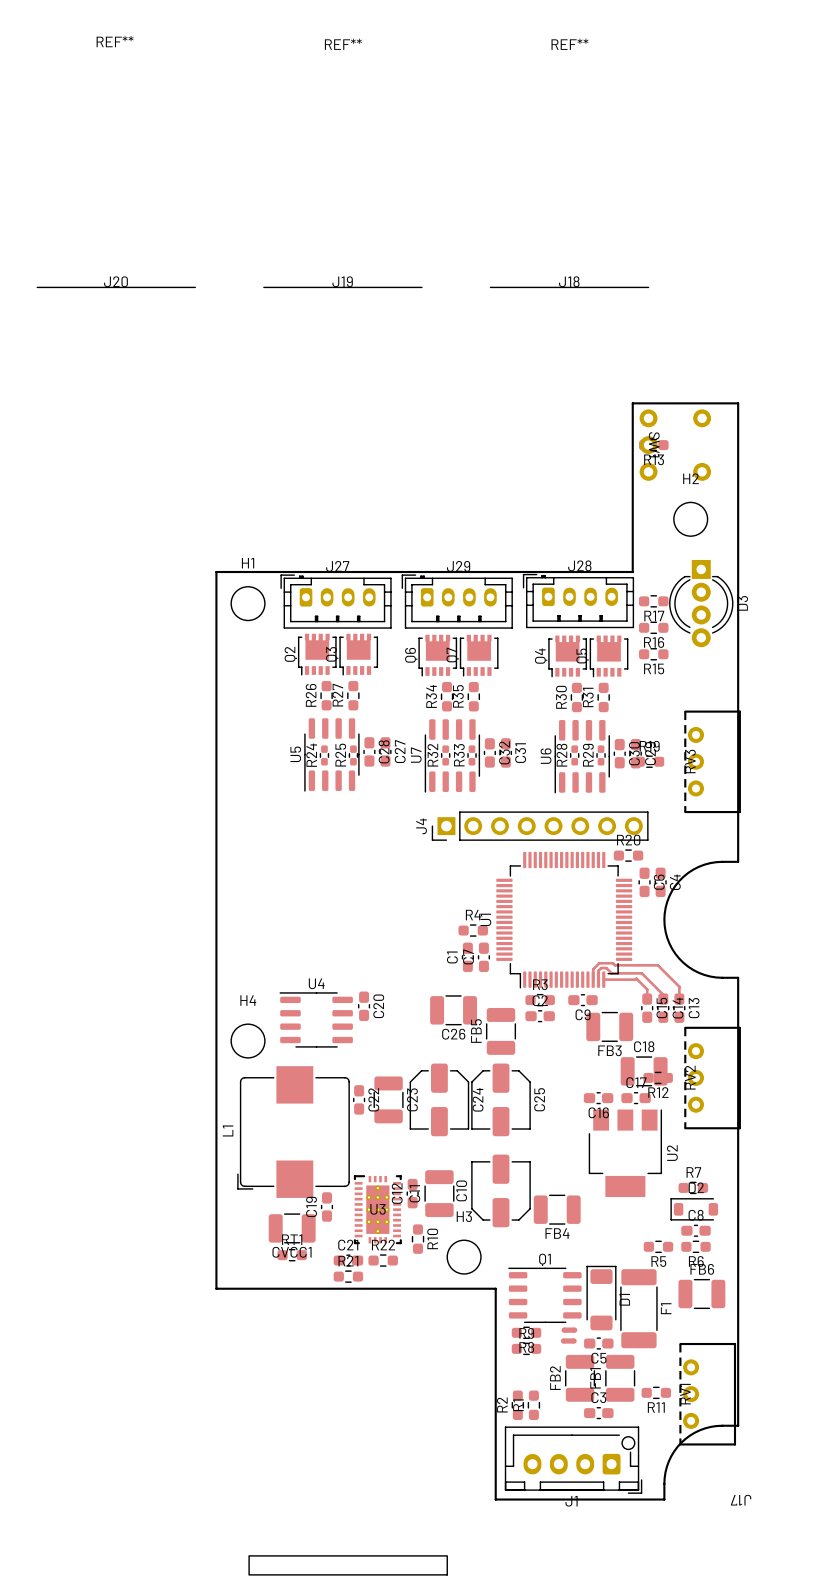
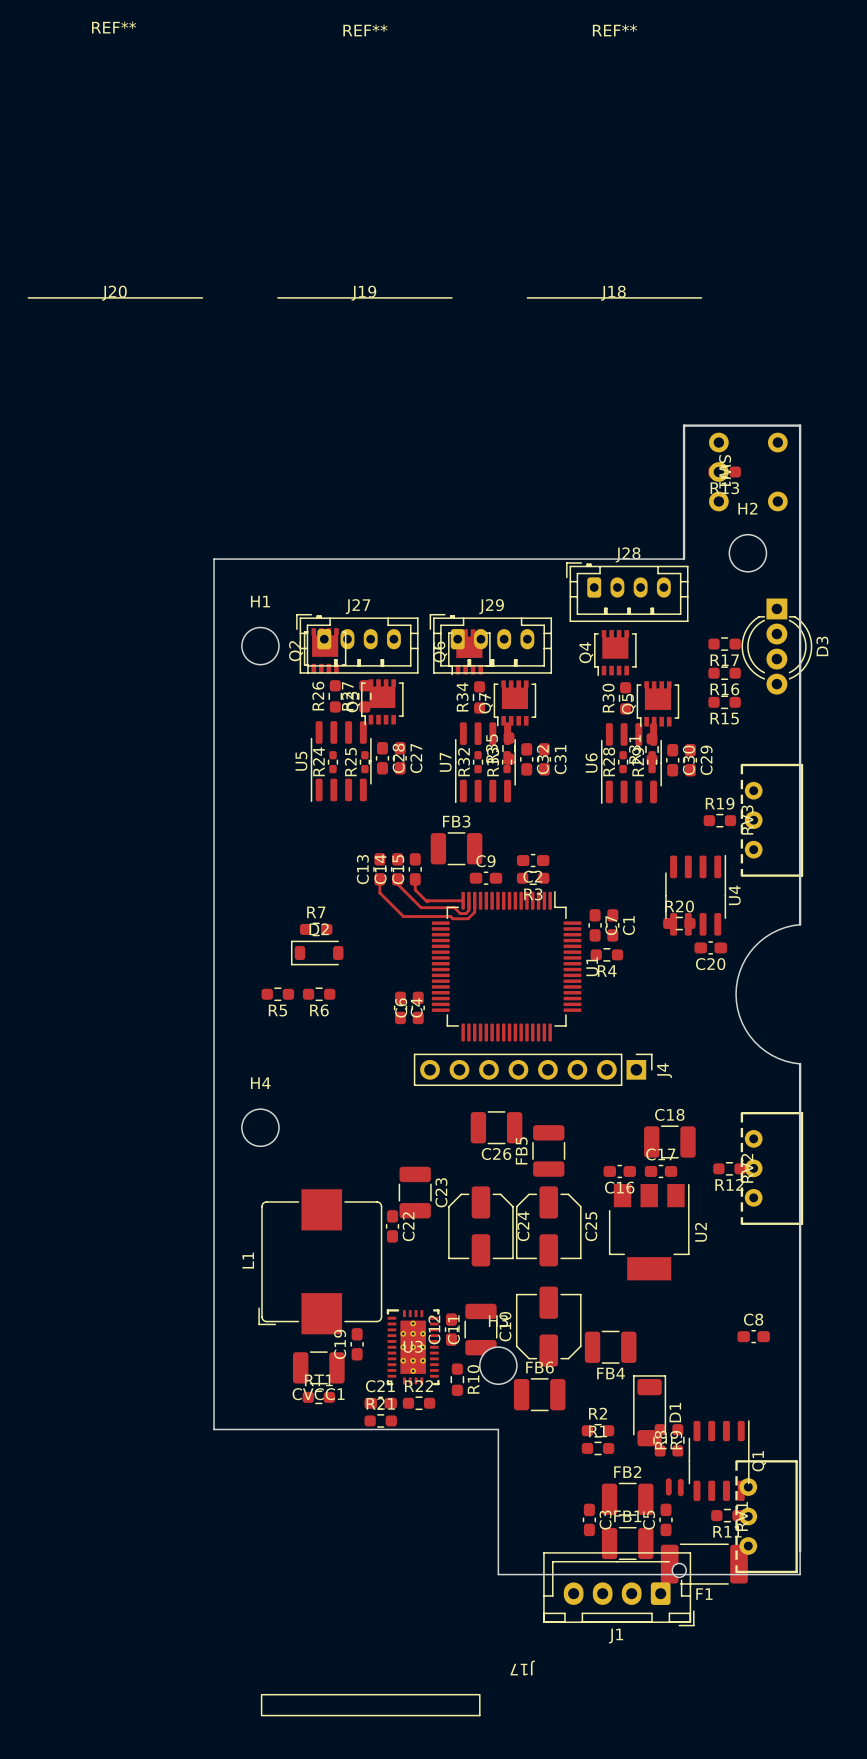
R13 position: (653, 445) -> (724, 472)
SW1 position: (675, 445) -> (748, 472)
board edge: (632, 524) (632, 572) (216, 572) (216, 1288) (495, 1288) (495, 1499) (664, 1499) (666, 1466) (674, 1451) (681, 1442) (690, 1435) (705, 1428) (738, 1425) -> (684, 559) (214, 559) (214, 1429) (498, 1429) (498, 1574) (800, 1574) (800, 1551)
J28 position: (578, 601) -> (627, 592)
R17 position: (653, 601) -> (724, 644)
D3 position: (701, 603) -> (776, 646)
R16 position: (653, 627) -> (724, 673)
Q2 position: (317, 654) -> (325, 651)
R15 position: (653, 654) -> (724, 702)
Q6 position: (437, 655) -> (469, 652)
Q4 position: (567, 656) -> (615, 653)
R26 position: (326, 695) -> (335, 696)
R27 position: (353, 695) -> (364, 696)
R34 position: (447, 696) -> (479, 697)
R30 position: (576, 697) -> (625, 698)
C28 position: (369, 751) -> (382, 758)
C27 position: (385, 751) -> (400, 758)
C32 position: (489, 752) -> (526, 759)
C31 position: (505, 752) -> (544, 759)
C30 position: (619, 753) -> (672, 760)
C29 position: (635, 753) -> (690, 760)
U5 position: (331, 754) -> (341, 761)
R24 position: (324, 755) -> (332, 762)
R25 position: (353, 755) -> (364, 762)
R32 position: (445, 755) -> (478, 762)
U7 position: (452, 755) -> (485, 762)
R33 position: (472, 755) -> (507, 762)
R28 position: (574, 755) -> (623, 762)
R29 position: (601, 755) -> (652, 762)
U6 position: (582, 756) -> (631, 763)
R19 position: (649, 761) -> (719, 820)
top track: none -> (379, 879) (379, 892) (403, 916) (450, 916) (452, 918) (468, 918) (474, 912) (474, 900)
top track: none -> (397, 879) (397, 884) (421, 907) (454, 907) (460, 913) (465, 913) (468, 910) (468, 900)
top track: none -> (415, 879) (415, 890) (427, 901) (463, 900)
J4 rotation: 0° (540, 826) -> 180° (533, 1069)
J4 position: (540, 826) -> (533, 1069)
board edge: (738, 856) (738, 861) (716, 862) (704, 864) (683, 876) (669, 896) (664, 919) (669, 943) (683, 962) (704, 974) (716, 977) (738, 977) (738, 983) -> (800, 924) (785, 927) (771, 933) (754, 946) (742, 965) (737, 979) (736, 994) (737, 1009) (742, 1023) (754, 1041) (771, 1055) (785, 1061) (800, 1063)
C6 position: (644, 882) -> (418, 1007)
C6 name position: C6 (659, 882) -> C6 (401, 1007)
C4 position: (660, 882) -> (400, 1007)
R4 name position: R4 (473, 915) -> R4 (607, 971)
U1 rotation: 0° (564, 920) -> 180° (506, 966)
U1 position: (564, 920) -> (506, 966)
R4 position: (473, 930) -> (606, 954)
C7 name position: C7 (468, 956) -> C7 (611, 925)
C1 name position: C1 (452, 957) -> C1 (628, 925)
C1 position: (467, 957) -> (612, 925)
C7 position: (483, 957) -> (595, 925)
top track: (593, 979) (593, 969) (599, 963) (657, 965) (679, 986) (679, 999) -> none
top track: (598, 979) (598, 970) (601, 968) (606, 968) (611, 973) (641, 973) (663, 994) (663, 999) -> none
top track: (603, 979) (636, 978) (647, 989) (647, 999) -> none
R3 name position: R3 (540, 984) -> R3 (533, 894)
C2 name position: C2 (540, 1000) -> C2 (532, 876)
R3 position: (540, 1000) -> (533, 878)
C9 position: (582, 1000) -> (486, 878)
C20 rotation: 0° (364, 1006) -> 90° clockwise (710, 947)
C20 position: (364, 1006) -> (710, 947)
C15 position: (647, 1008) -> (415, 869)
C15 name position: C15 (661, 1008) -> C15 (398, 869)
C14 position: (663, 1008) -> (397, 869)
C14 name position: C14 (677, 1008) -> C14 (380, 869)
C13 position: (679, 1008) -> (379, 869)
C13 name position: C13 (694, 1008) -> C13 (362, 869)
C26 position: (453, 1010) -> (496, 1127)
C9 name position: C9 (583, 1014) -> C9 (485, 861)
C2 position: (540, 1016) -> (533, 860)
U4 rotation: 0° (316, 1019) -> 90° clockwise (695, 895)
U4 position: (316, 1019) -> (695, 895)
FB3 position: (609, 1026) -> (456, 848)
FB5 position: (501, 1031) -> (548, 1150)
FB3 name position: FB3 (609, 1050) -> FB3 (456, 821)
C18 position: (644, 1071) -> (669, 1141)
R12 position: (658, 1077) -> (729, 1168)
C16 position: (598, 1098) -> (619, 1171)
C17 position: (636, 1098) -> (661, 1171)
C22 position: (359, 1099) -> (392, 1226)
C24 position: (439, 1099) -> (480, 1226)
C25 position: (501, 1099) -> (548, 1226)
L1 position: (293, 1132) -> (320, 1261)
U2 position: (625, 1153) -> (649, 1232)
R7 position: (693, 1187) -> (316, 929)
C10 position: (501, 1190) -> (548, 1326)
C12 position: (412, 1193) -> (451, 1329)
C11 position: (439, 1193) -> (480, 1329)
C19 position: (326, 1207) -> (357, 1344)
U3 position: (377, 1209) -> (413, 1347)
FB4 position: (557, 1209) -> (610, 1347)
D2 position: (694, 1209) -> (317, 953)
CVCC1 position: (292, 1228) -> (318, 1367)
R10 position: (418, 1239) -> (457, 1379)
R5 position: (658, 1246) -> (277, 994)
R6 position: (695, 1246) -> (319, 994)
RT1 position: (292, 1255) -> (318, 1397)
C21 position: (348, 1260) -> (380, 1403)
R22 position: (383, 1260) -> (419, 1403)
R21 position: (348, 1276) -> (380, 1420)
FB6 position: (701, 1293) -> (539, 1394)
Q1 rotation: 0° (544, 1295) -> 90° clockwise (719, 1460)
Q1 position: (544, 1295) -> (719, 1460)
F1 rotation: 0° (638, 1308) -> 90° clockwise (704, 1564)
F1 position: (638, 1308) -> (704, 1564)
part: (569, 1330) -> none
R8 rotation: 0° (526, 1332) -> 90° clockwise (677, 1440)
R8 position: (526, 1332) -> (677, 1440)
part: (568, 1341) -> none
C5 rotation: 0° (598, 1343) -> 90° clockwise (666, 1519)
C5 position: (598, 1343) -> (666, 1519)
R9 rotation: 0° (526, 1348) -> 90° clockwise (660, 1440)
R9 position: (526, 1348) -> (660, 1440)
part: none -> (668, 1486)
part: none -> (680, 1487)
FB2 rotation: 0° (580, 1378) -> 90° clockwise (627, 1499)
FB1 rotation: 0° (620, 1378) -> 90° clockwise (627, 1543)
FB1 position: (620, 1378) -> (627, 1543)
R11 position: (656, 1392) -> (727, 1515)
R2 rotation: 0° (517, 1405) -> 90° clockwise (598, 1430)
R2 position: (517, 1405) -> (598, 1430)
R1 rotation: 0° (533, 1405) -> 90° clockwise (598, 1448)
R1 position: (533, 1405) -> (598, 1448)
C3 rotation: 0° (598, 1413) -> 90° clockwise (589, 1519)
C3 position: (598, 1413) -> (589, 1519)
J17 name position: J17 (741, 1500) -> J17 (522, 1667)

